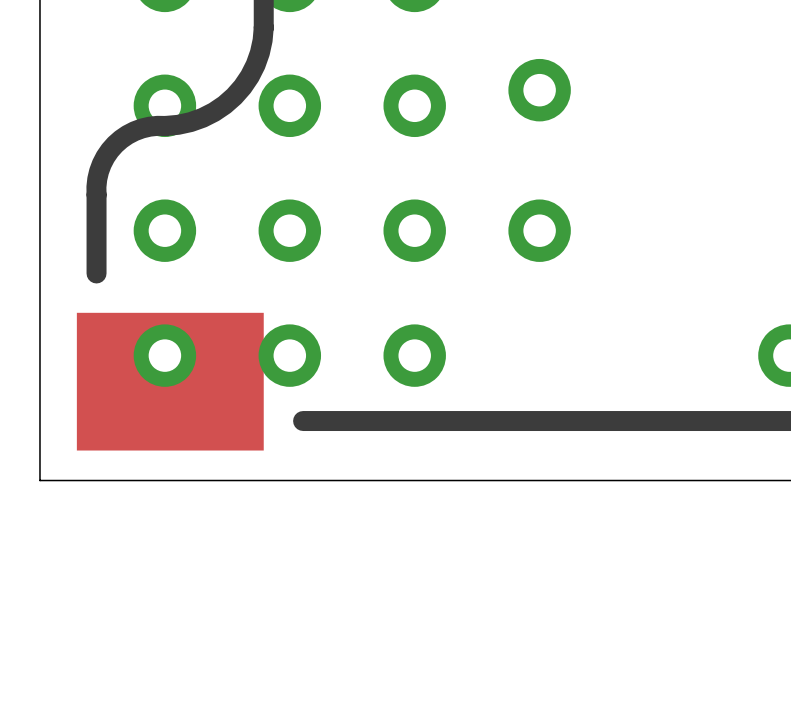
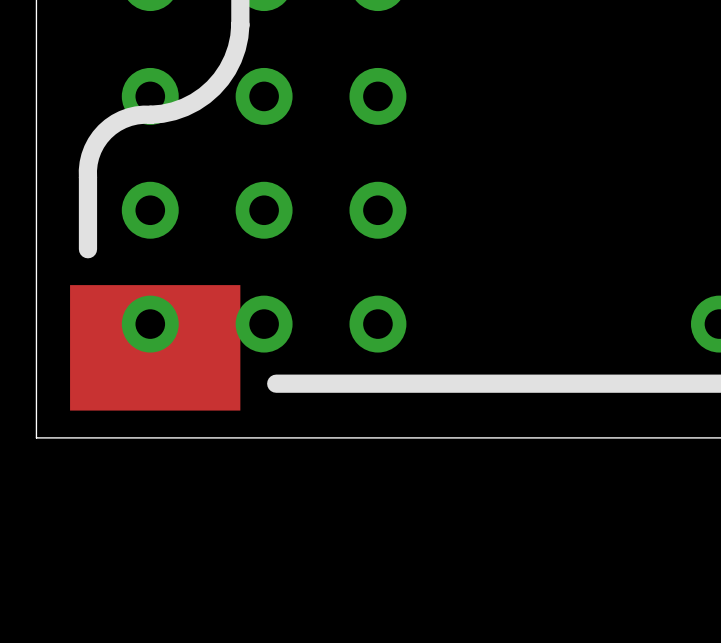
via: (539, 90) -> none
via: (539, 230) -> none

